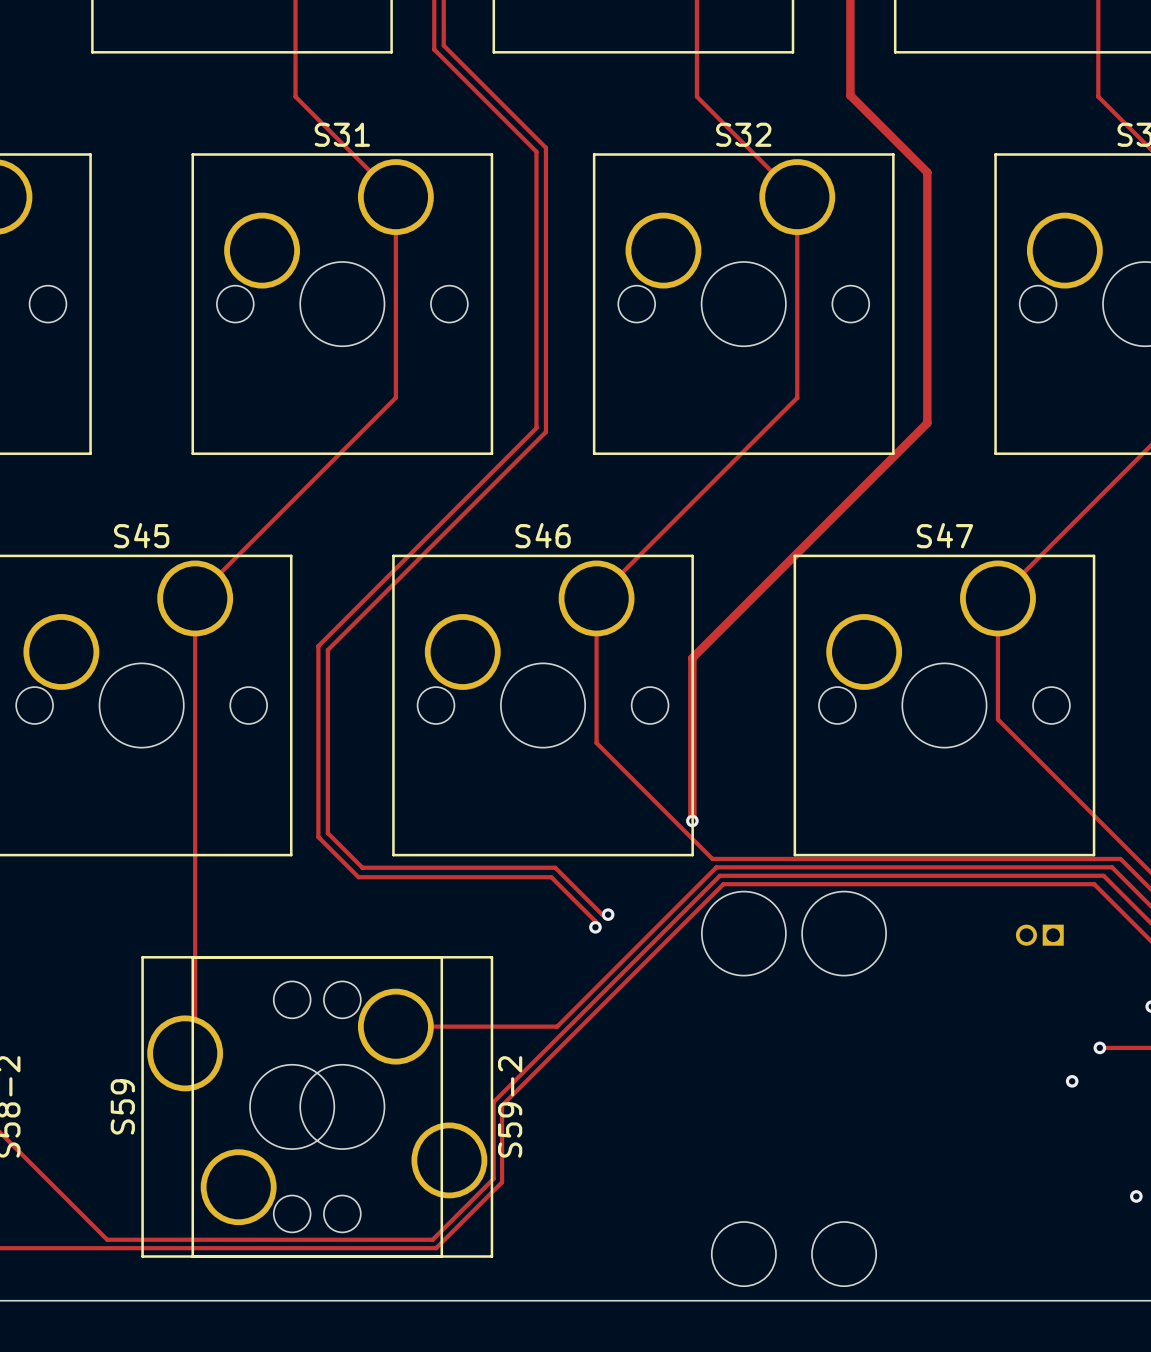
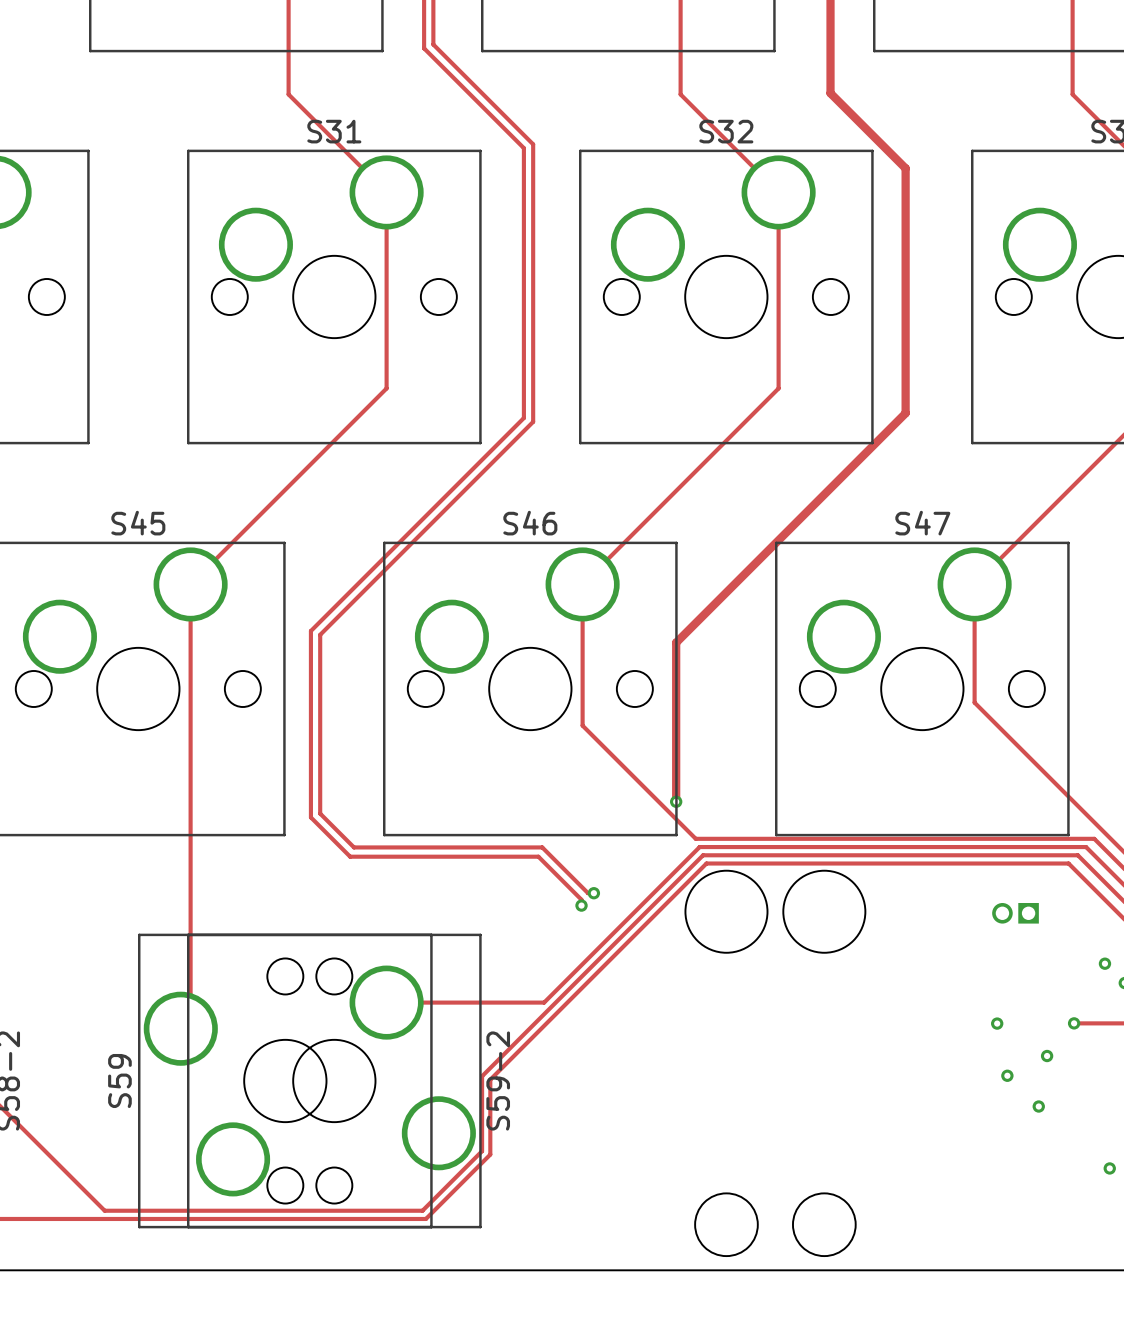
via: none -> (1104, 963)
via: none -> (997, 1023)
via: none -> (1007, 1075)
via: none -> (1038, 1106)

